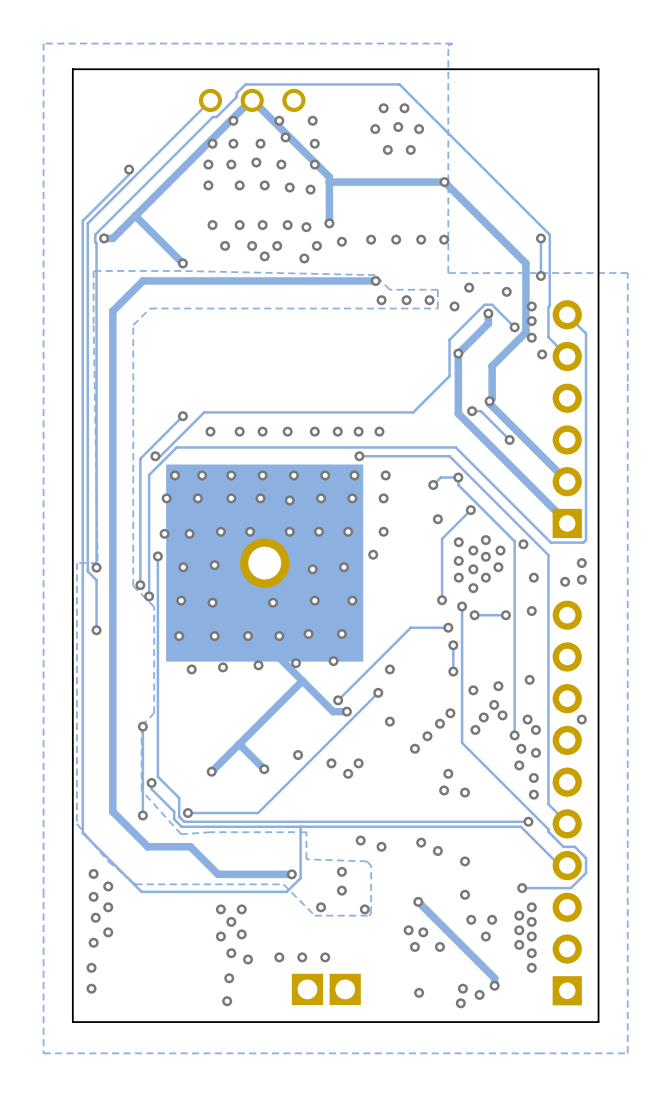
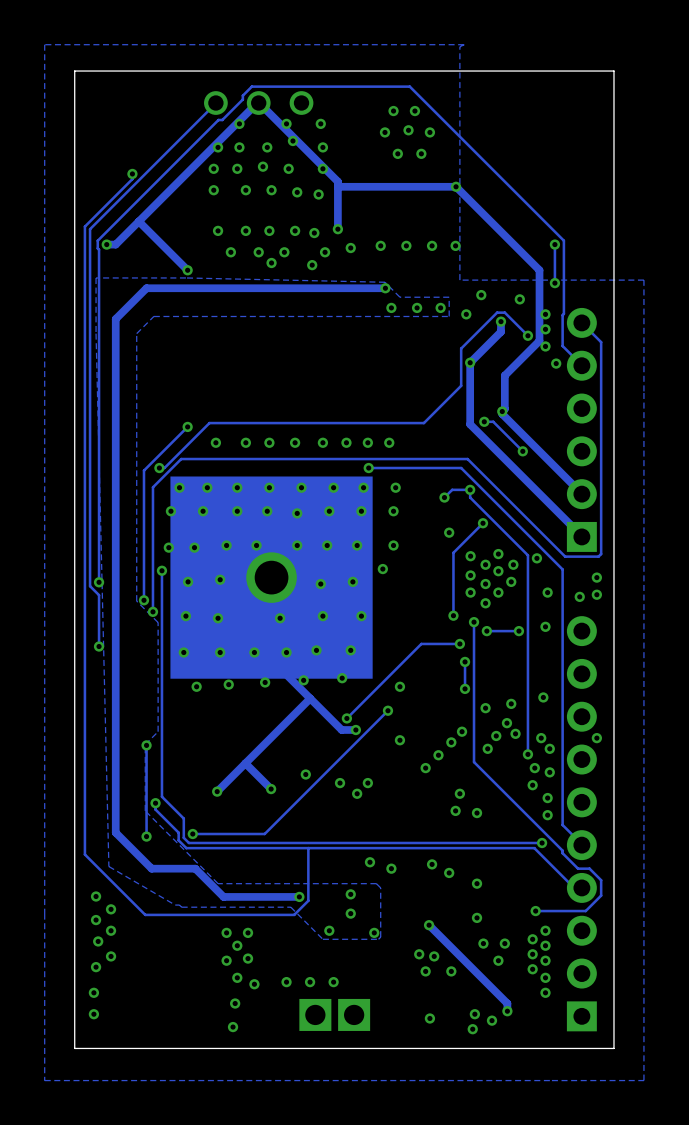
zone outline: (93, 325) (97, 563) (76, 563) (76, 823) (108, 861) (135, 884) (177, 884) -> (96, 333) (108, 866) (181, 907)
zone outline: (141, 790) (181, 834) (210, 832) (306, 832) (306, 859) (366, 861) -> (145, 810) (218, 883) (376, 883)

